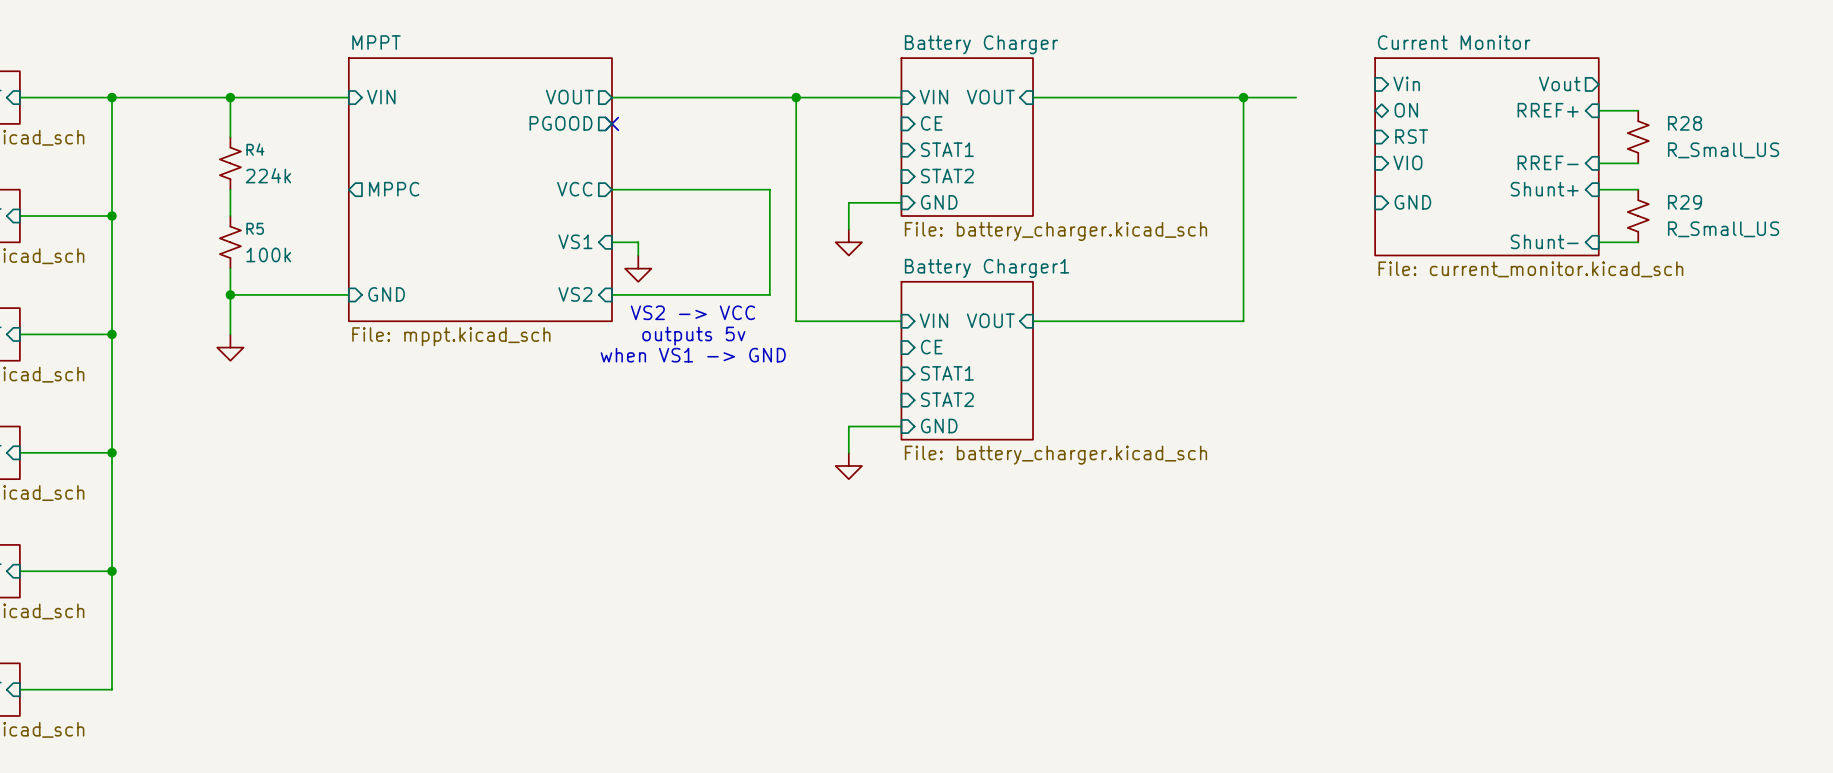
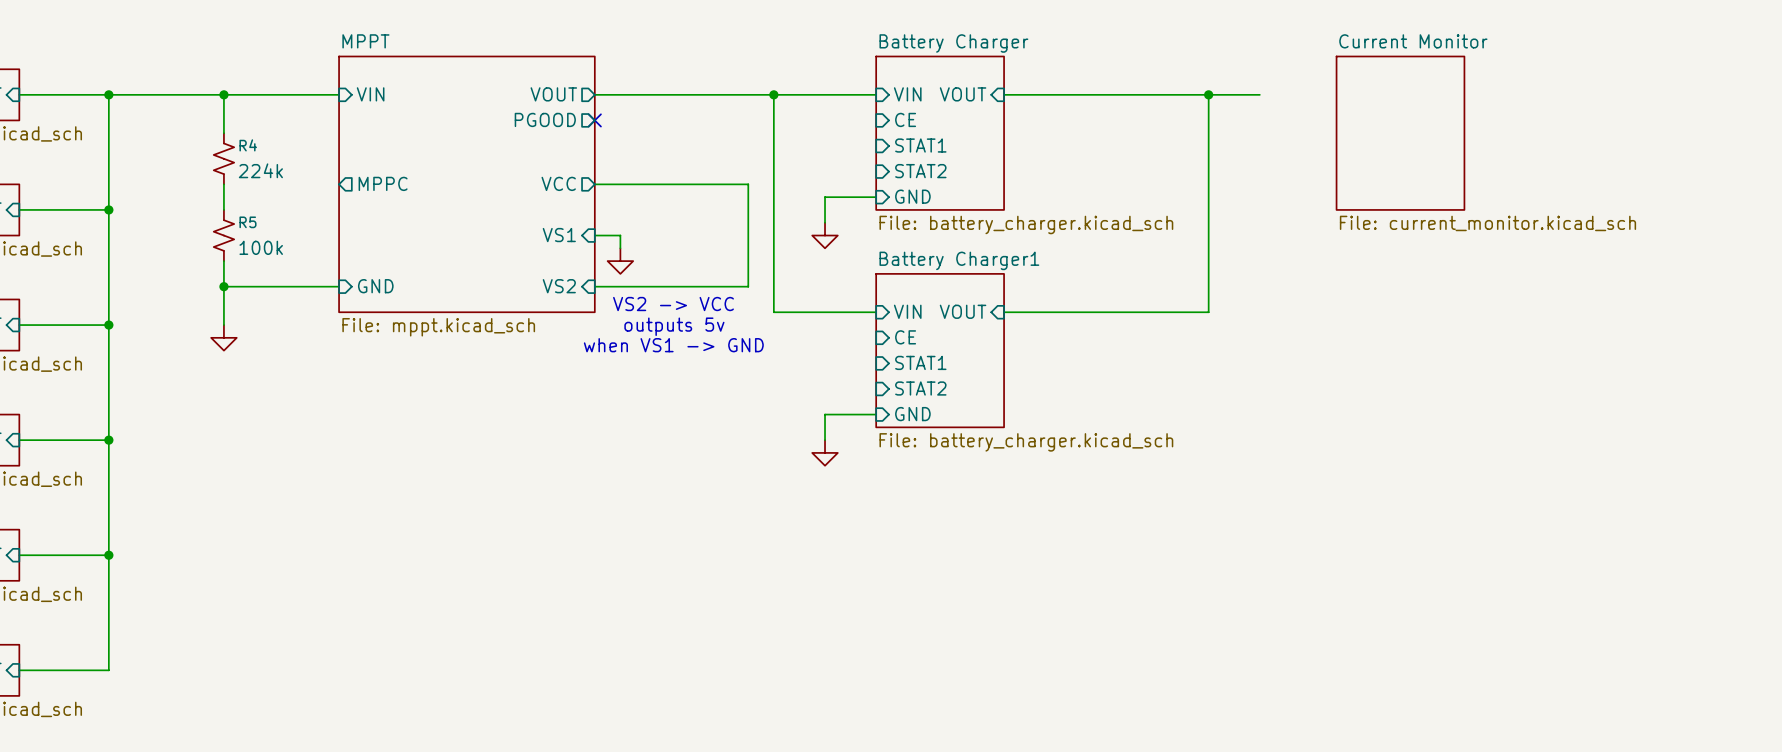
sheet pin: Vin (1406, 83) -> none
sheet pin: Vout (1559, 83) -> none
sheet pin: ON (1406, 110) -> none
sheet pin: RREF+ (1548, 110) -> none
wire: (1598, 110) (1638, 110) -> none
sheet pin: RST (1411, 136) -> none
sheet Current Monitor: none -> File: current_monitor.kicad_sch (1400, 133)
R28: R_Small_US (1638, 137) -> none
sheet Current Monitor: File: current_monitor.kicad_sch (1486, 156) -> none
sheet pin: VIO (1407, 162) -> none
sheet pin: RREF- (1548, 162) -> none
wire: (1598, 163) (1638, 163) -> none
sheet pin: Shunt+ (1544, 189) -> none
wire: (1598, 189) (1638, 189) -> none
sheet pin: GND (1412, 202) -> none
R29: R_Small_US (1638, 216) -> none
sheet pin: Shunt- (1544, 241) -> none
wire: (1598, 242) (1638, 242) -> none

